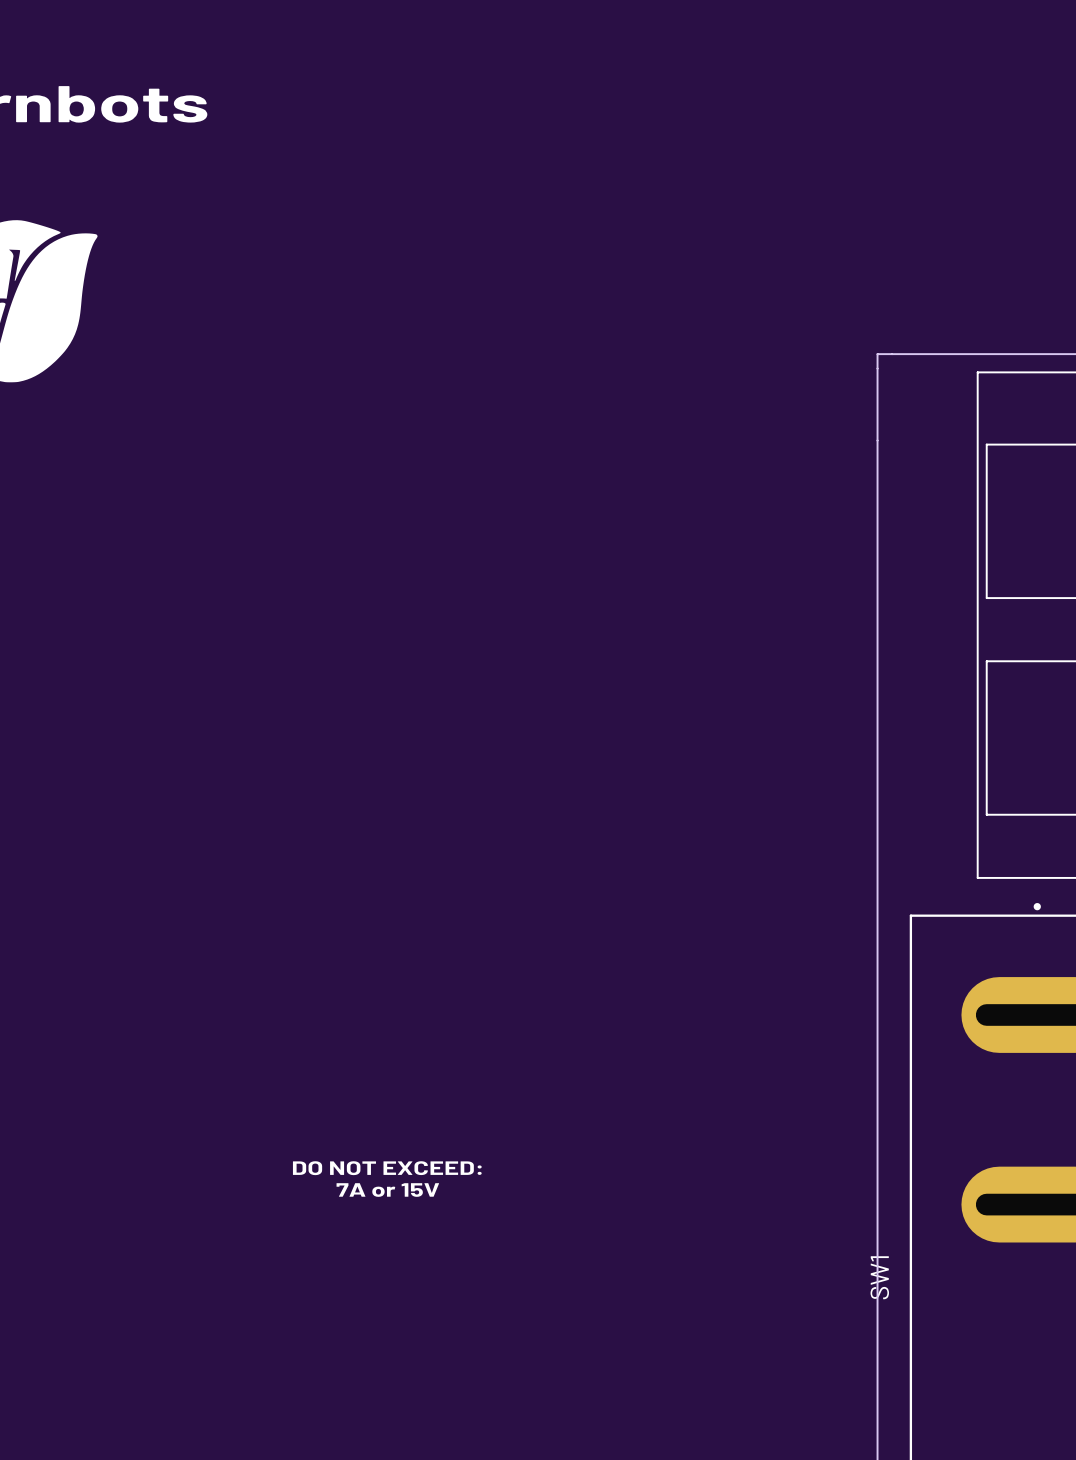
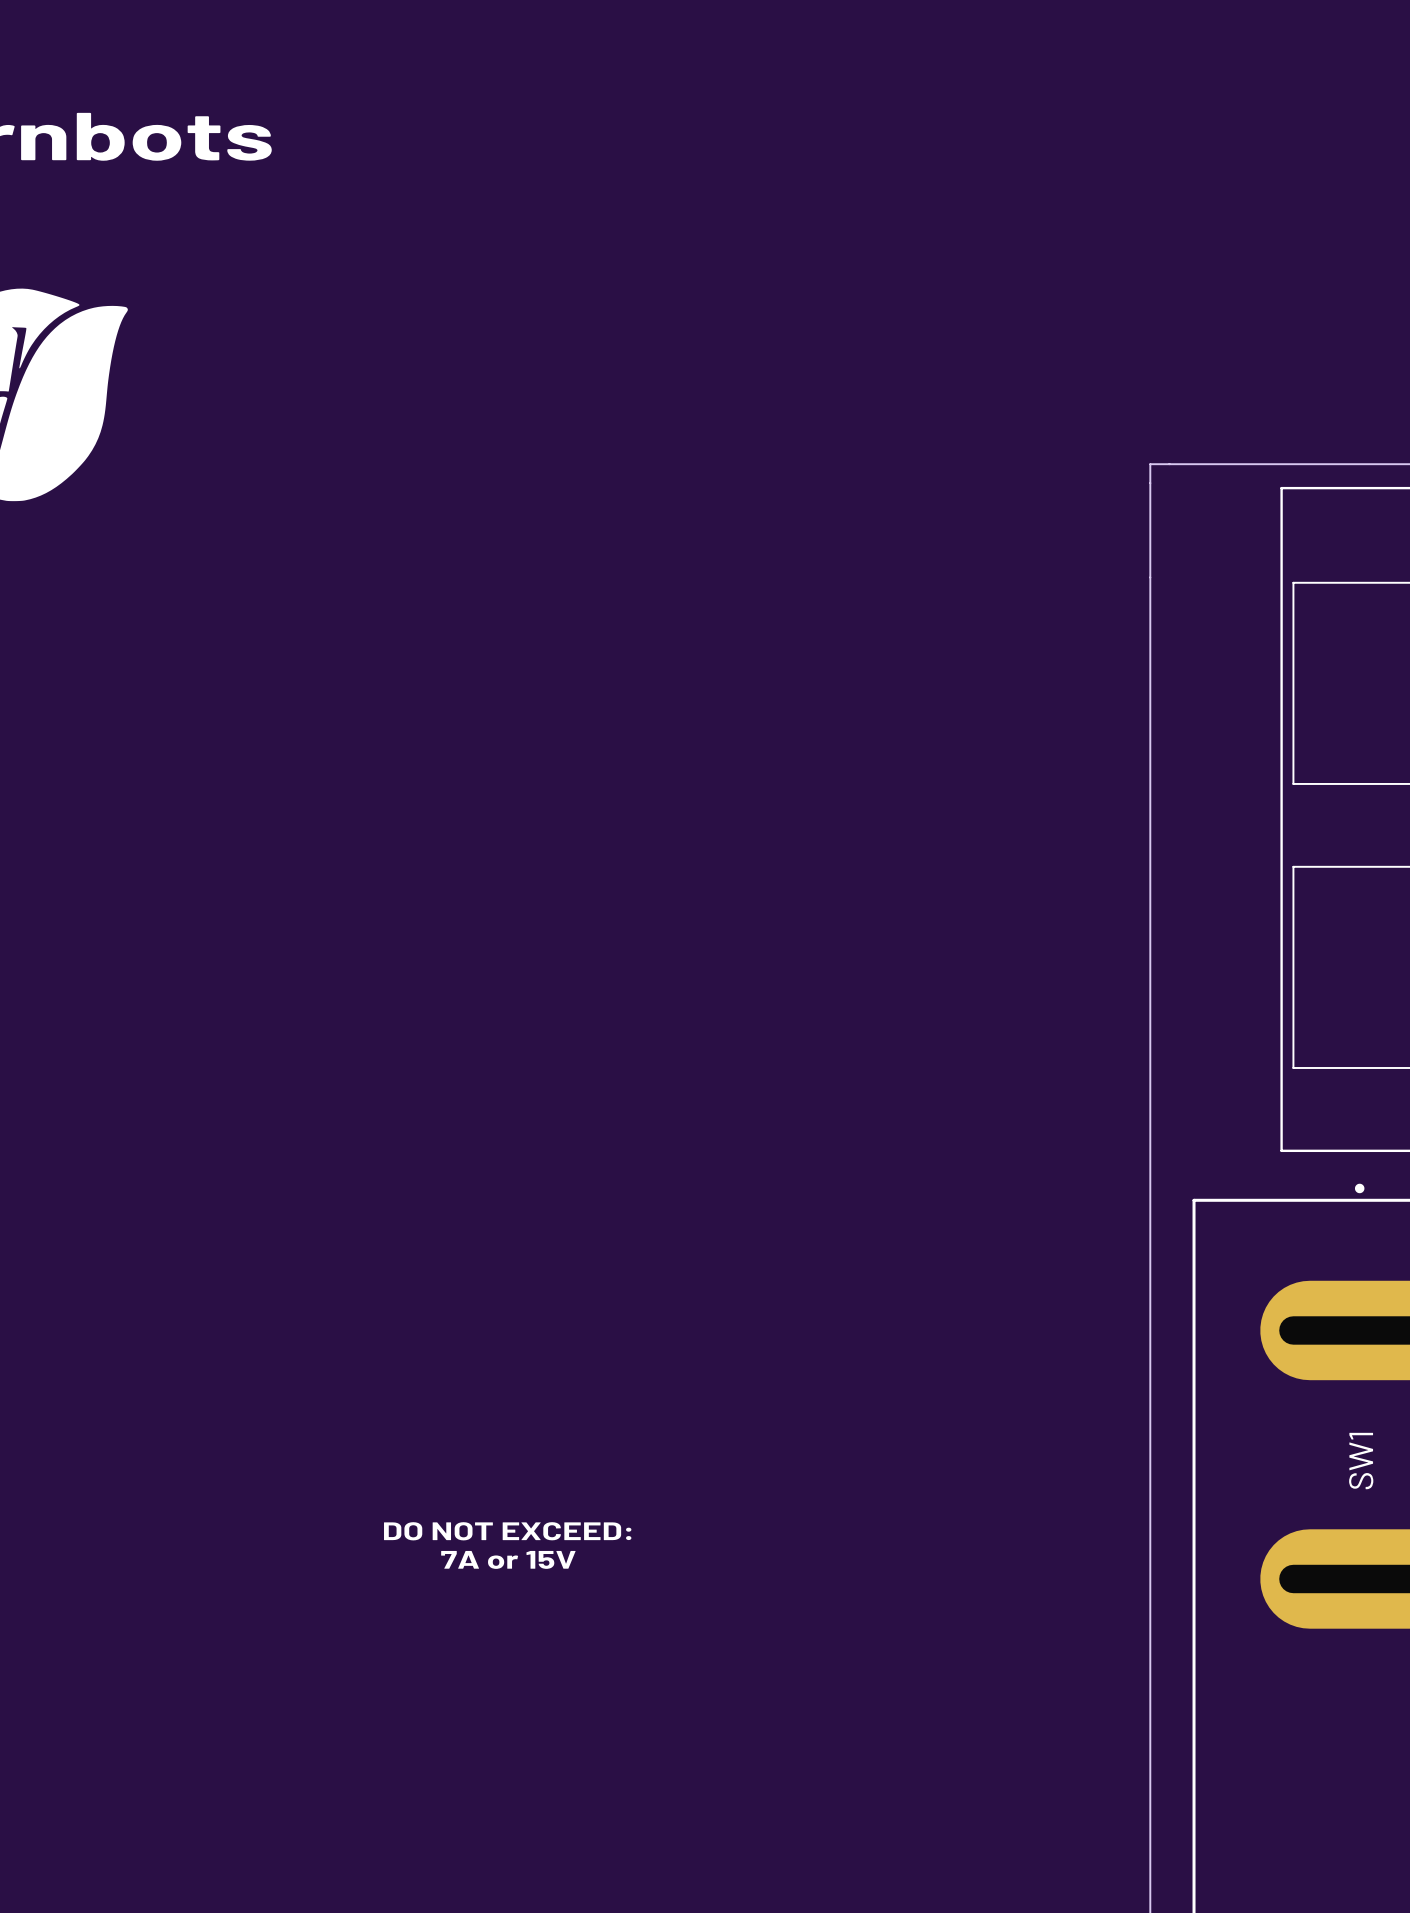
SW1 name position: SW1 (879, 1277) -> SW1 (1361, 1461)

